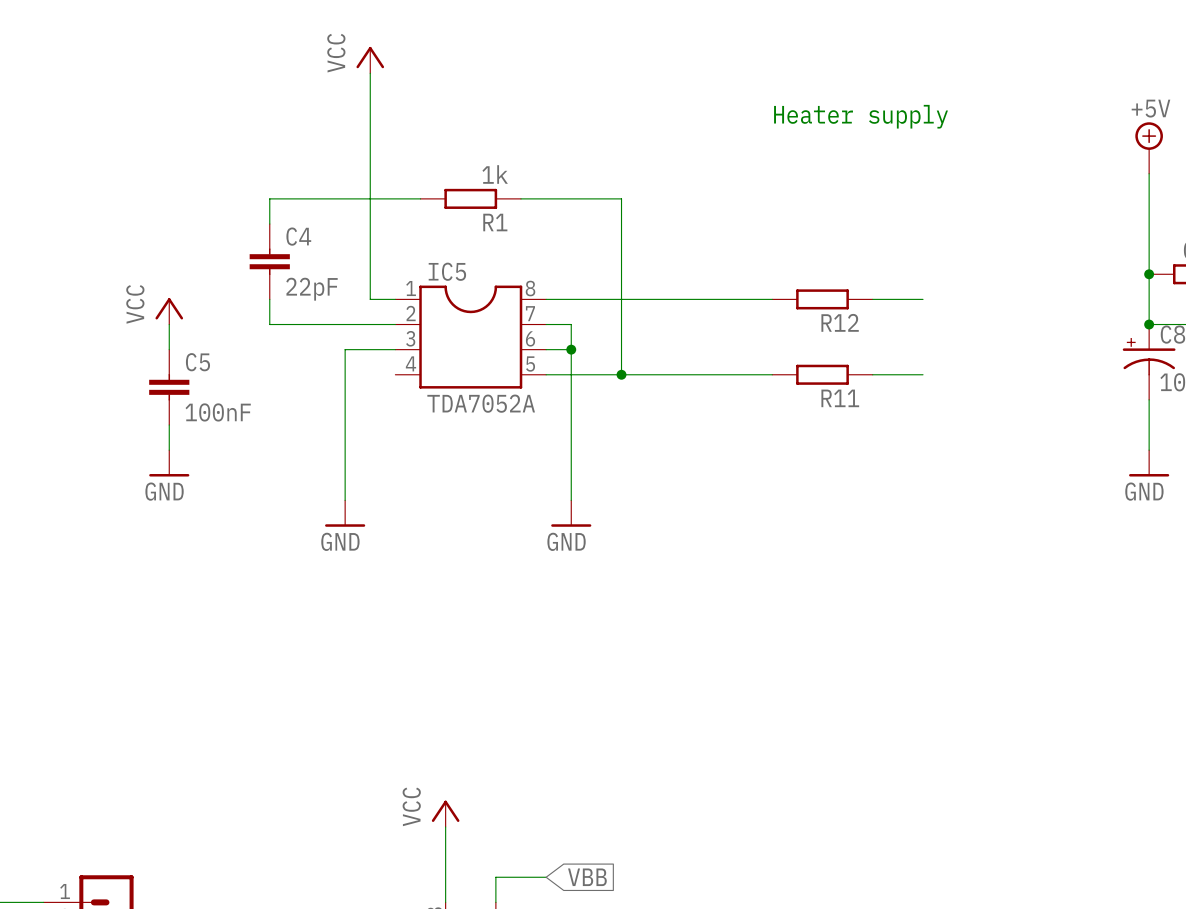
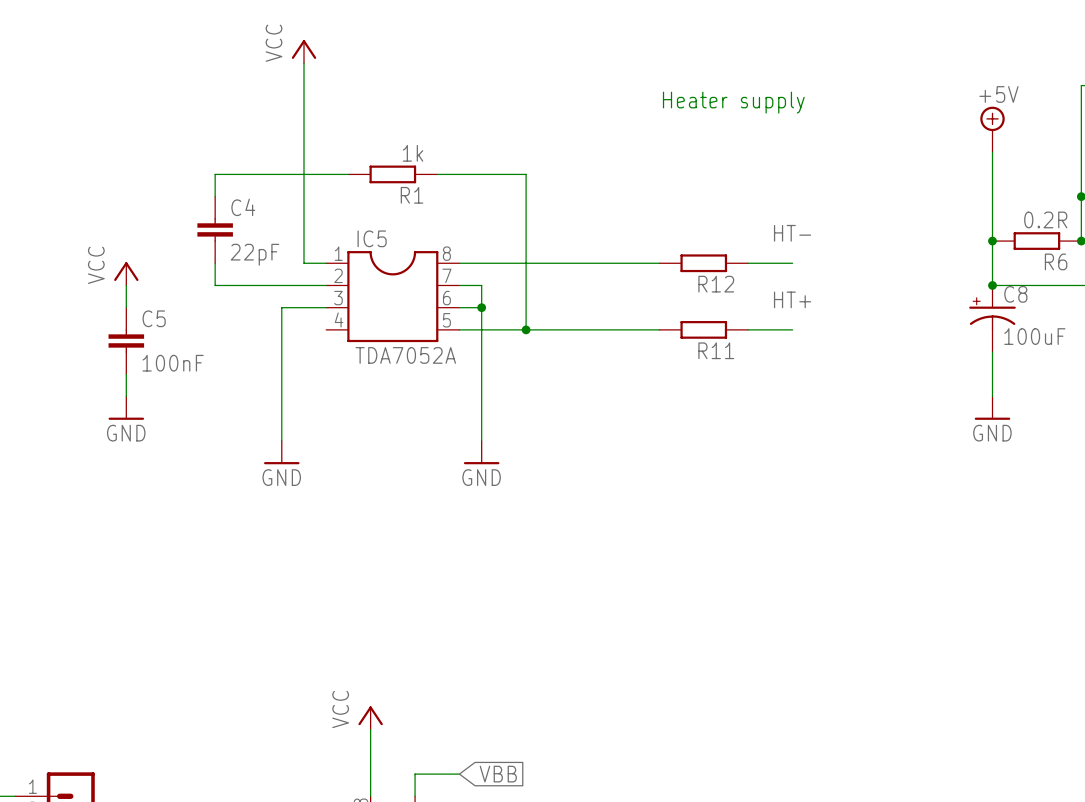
label: none -> HT- (792, 233)
label: none -> HT+ (792, 299)

